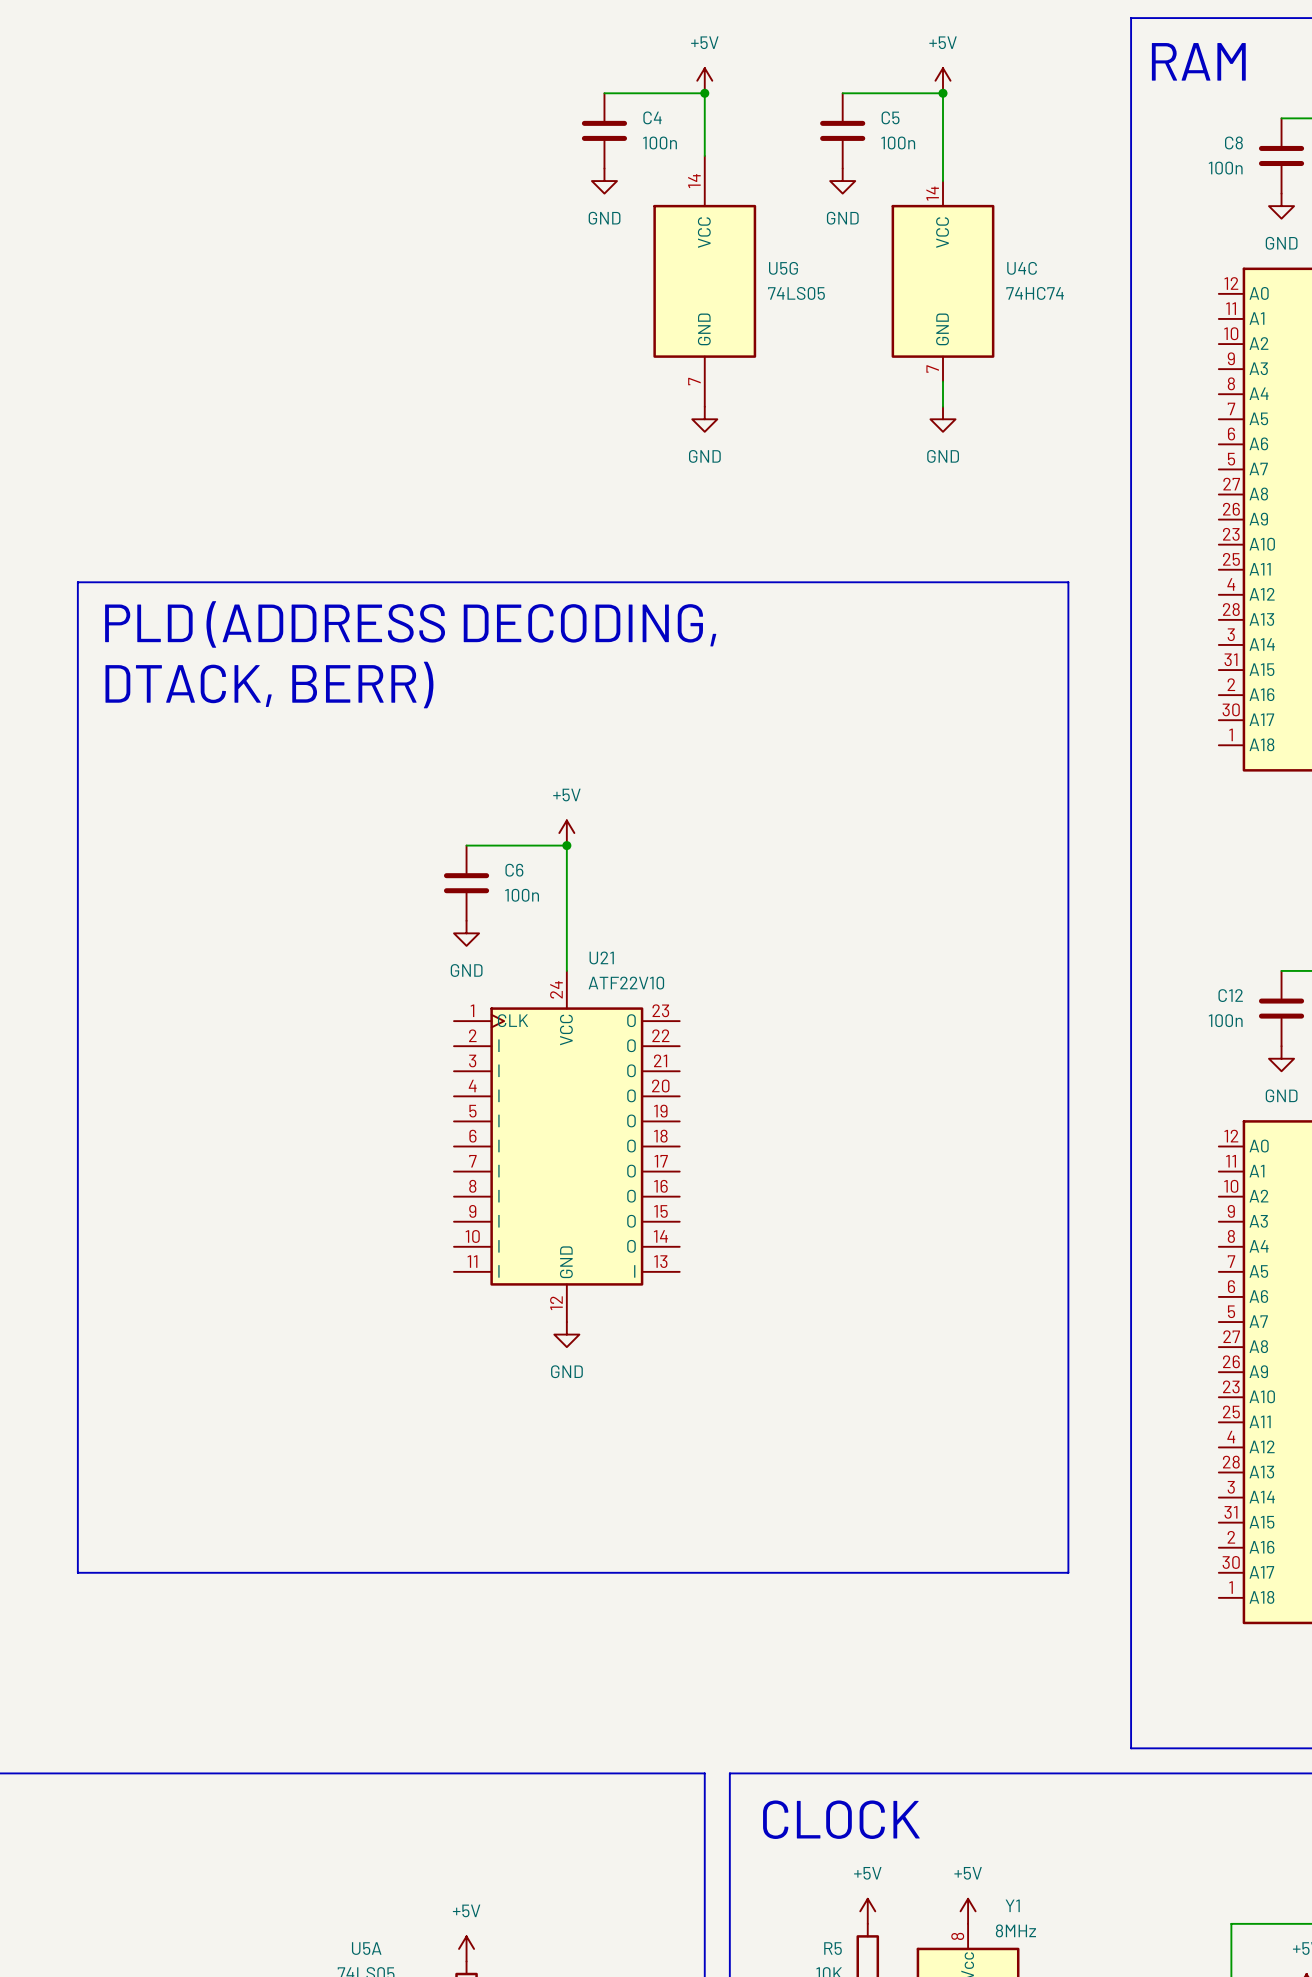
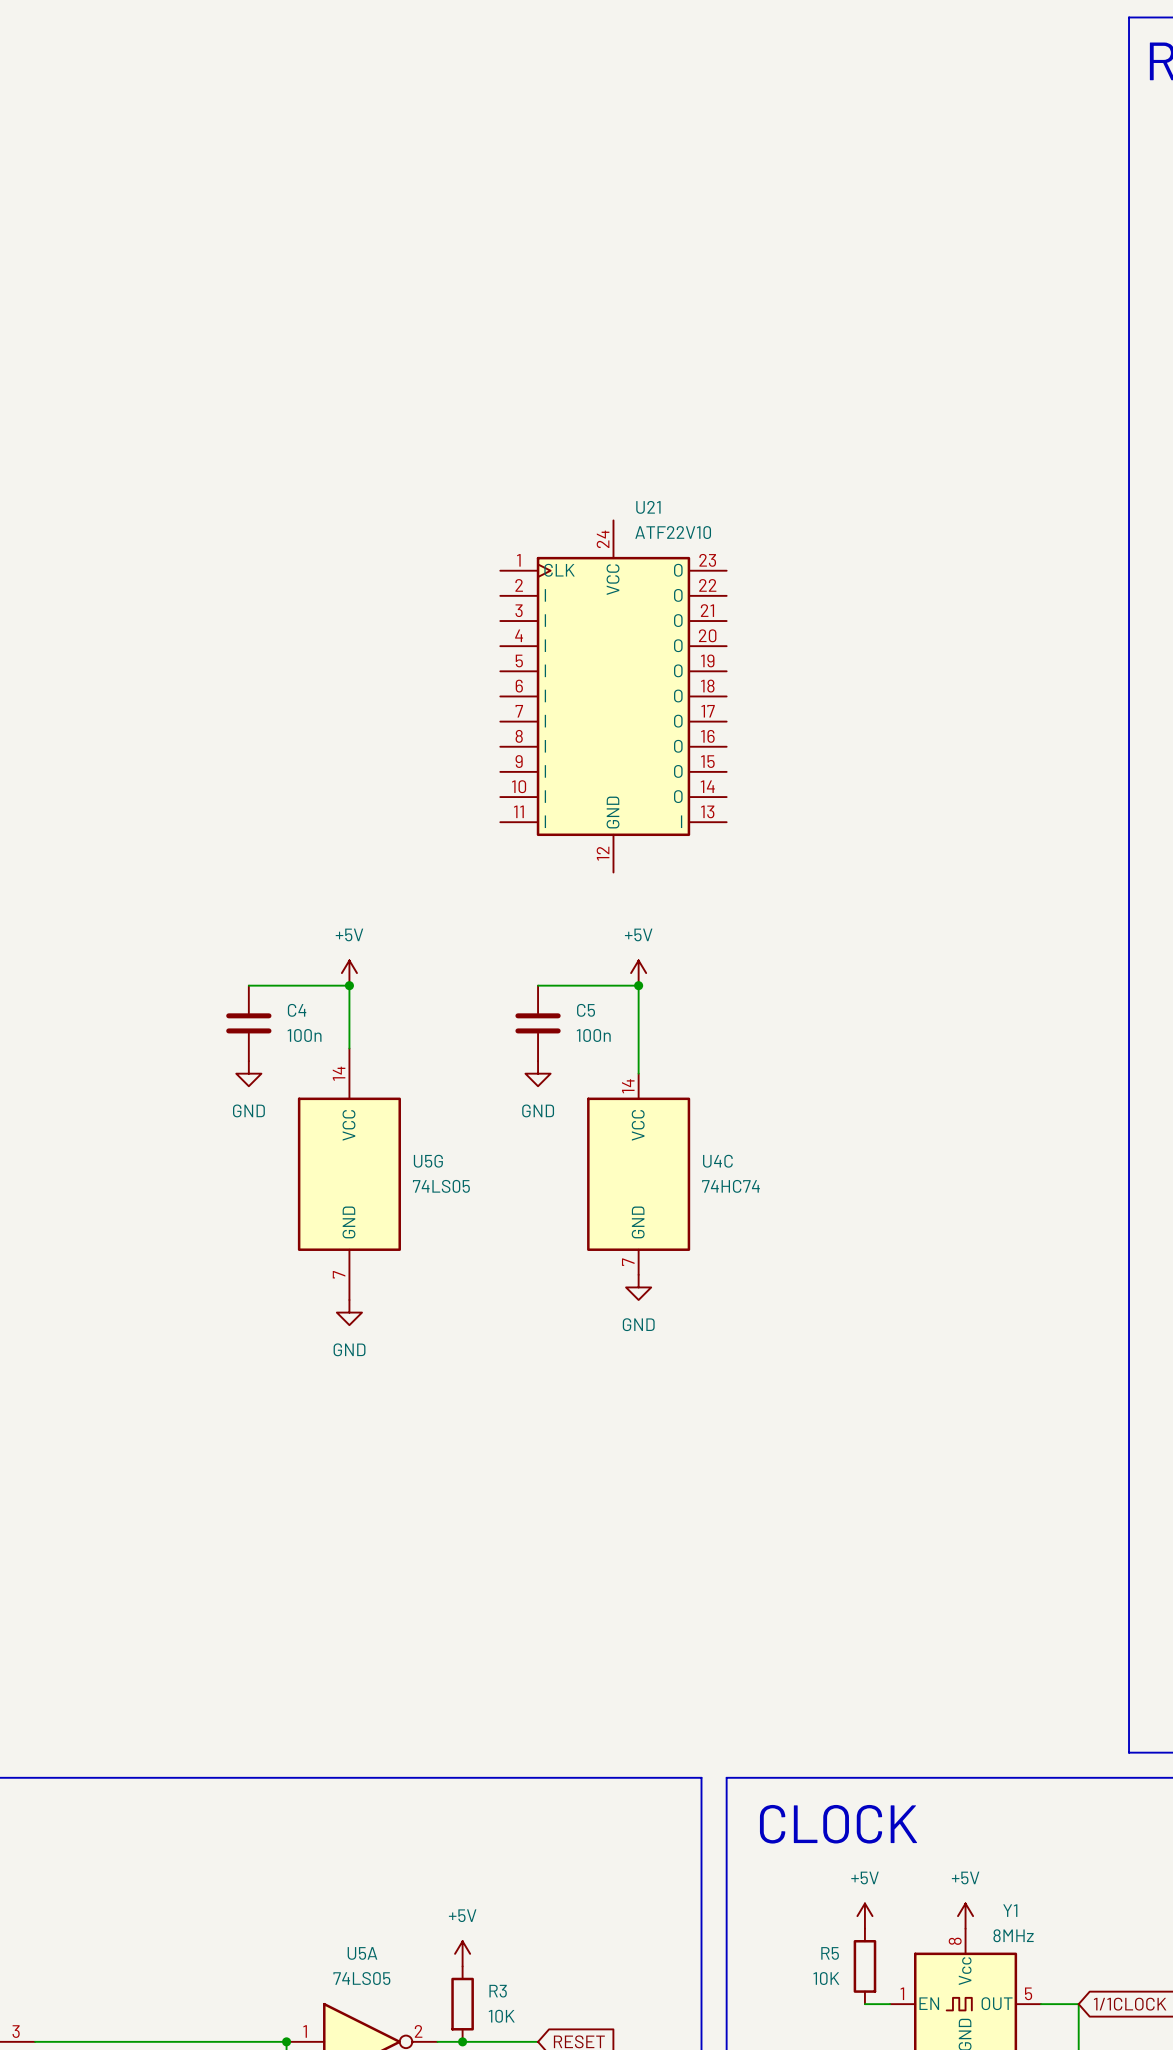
power symbol: +5V (704, 80) -> none
power symbol: +5V (943, 80) -> none
wire: (604, 93) (704, 93) (704, 155) -> none
junction: (704, 93) -> none
wire: (842, 93) (943, 93) (943, 181) -> none
junction: (943, 93) -> none
C4 position: (604, 130) -> (248, 1023)
C5 position: (842, 130) -> (538, 1023)
power symbol: GND (604, 181) -> none
power symbol: GND (842, 181) -> none
U5G position: (704, 281) -> (349, 1174)
U4C position: (943, 281) -> (638, 1174)
wire: (943, 381) (943, 406) -> none
power symbol: GND (704, 419) -> none
power symbol: GND (943, 419) -> none
line: (77, 582) (1068, 582) (1068, 1572) (77, 1572) (77, 582) -> none
text: PLD (ADDRESS DECODING, (410, 624) -> none
text: DTACK, BERR) (269, 685) -> none
power symbol: +5V (566, 833) -> none
wire: (466, 845) (566, 845) (566, 970) -> none
junction: (566, 845) -> none
C6: 100n (466, 883) -> none
power symbol: GND (466, 933) -> none
power symbol: none -> +5V (349, 973)
power symbol: none -> +5V (638, 973)
wire: none -> (248, 985) (349, 985) (349, 1048)
junction: none -> (349, 985)
wire: none -> (538, 985) (638, 985) (638, 1073)
junction: none -> (638, 985)
power symbol: none -> GND (248, 1073)
power symbol: none -> GND (538, 1073)
U21 position: (566, 1146) -> (613, 696)
power symbol: none -> GND (349, 1312)
power symbol position: GND (566, 1334) -> GND (638, 1287)

